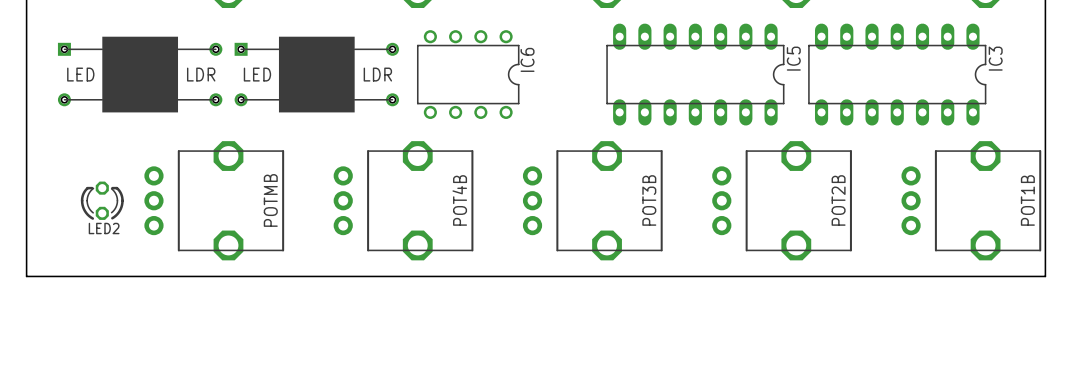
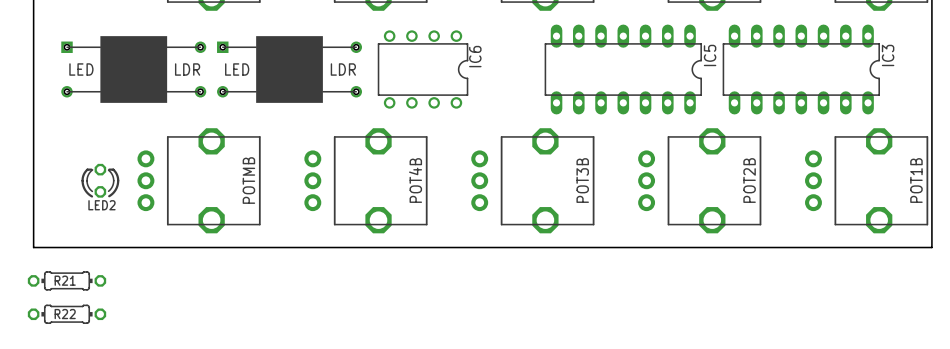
R21: none -> (67, 280)
R22: none -> (67, 314)

